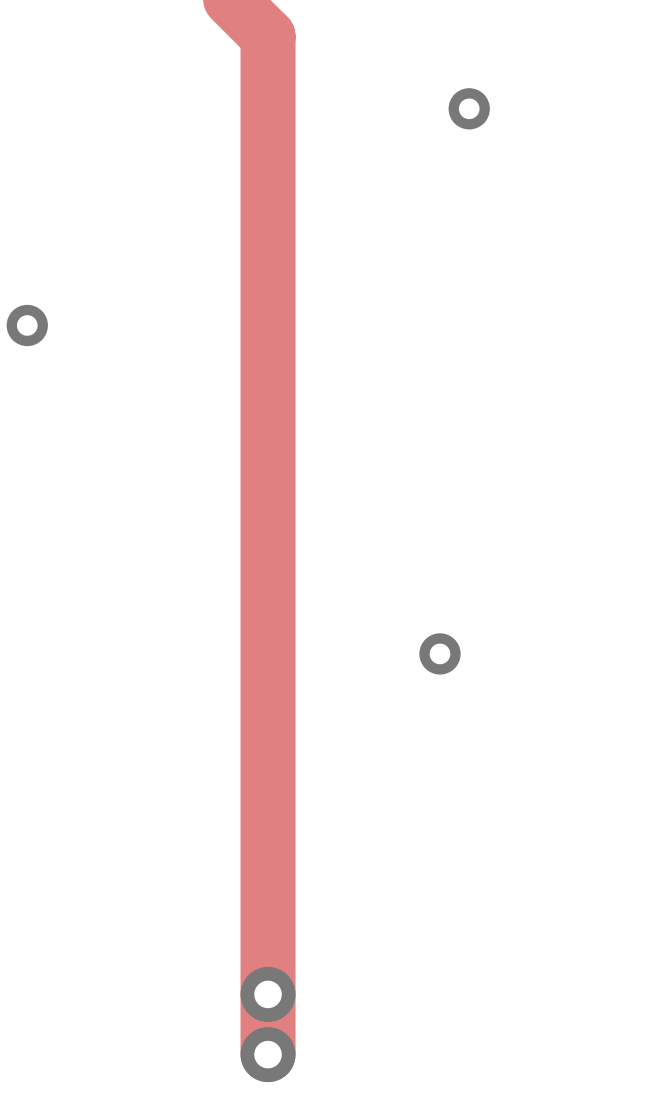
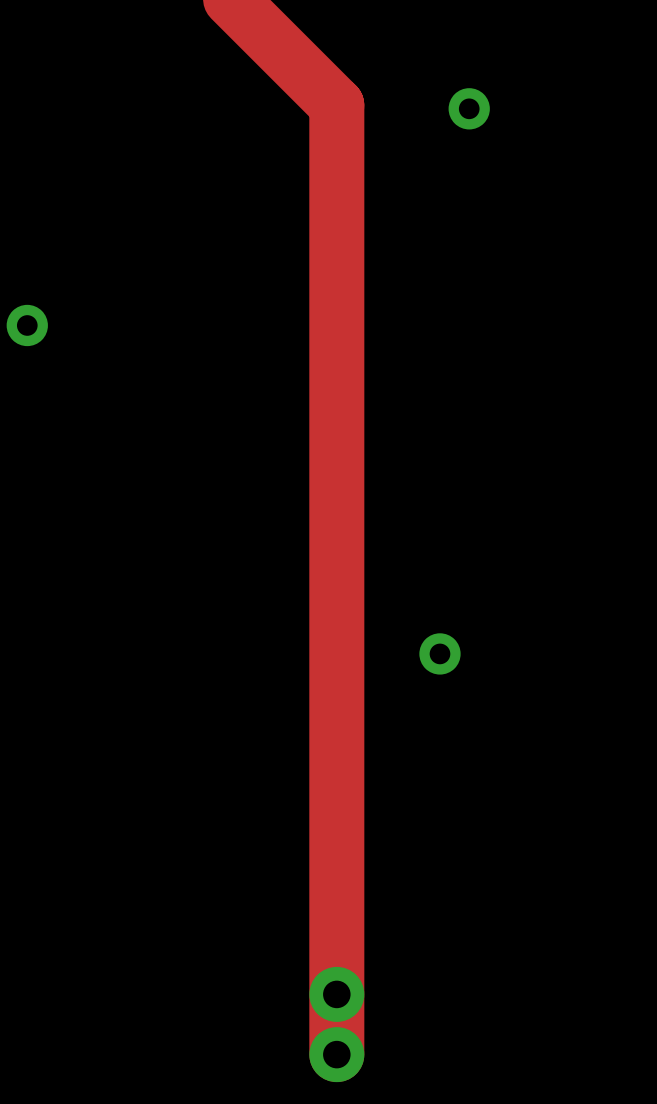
track: (268, 36) (268, 1054) -> (268, 36) (336, 105) (336, 1054)
via: (268, 994) -> none
via: none -> (336, 994)
via: (268, 1054) -> none
via: none -> (336, 1054)

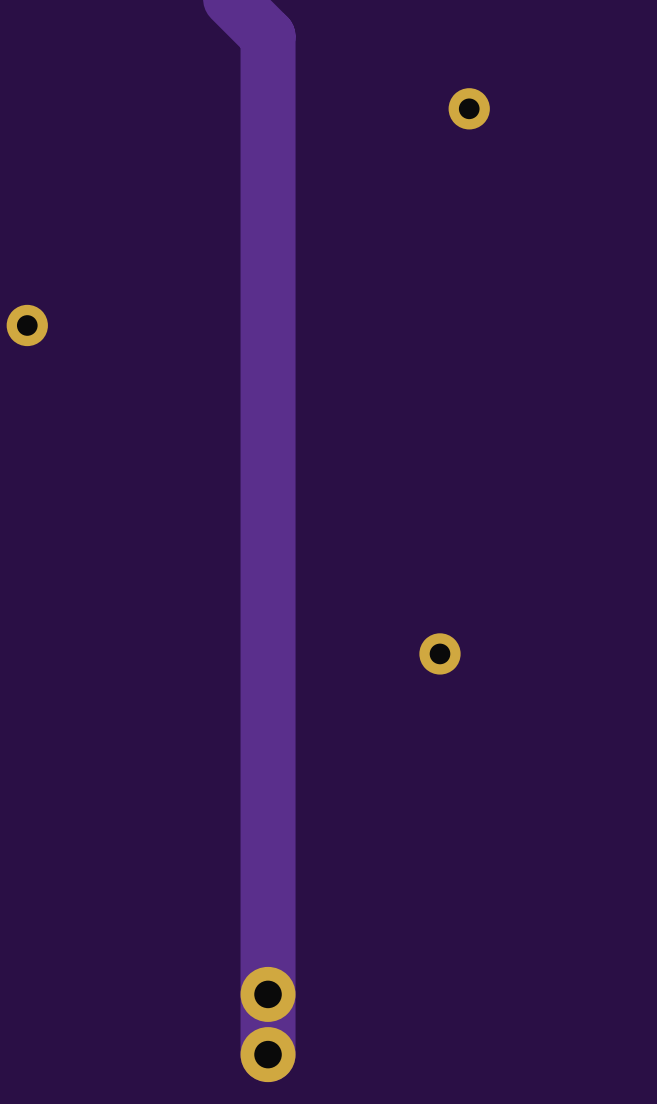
track: (268, 36) (336, 105) (336, 1054) -> (268, 36) (268, 1054)
via: none -> (268, 994)
via: (336, 994) -> none
via: none -> (268, 1054)
via: (336, 1054) -> none

